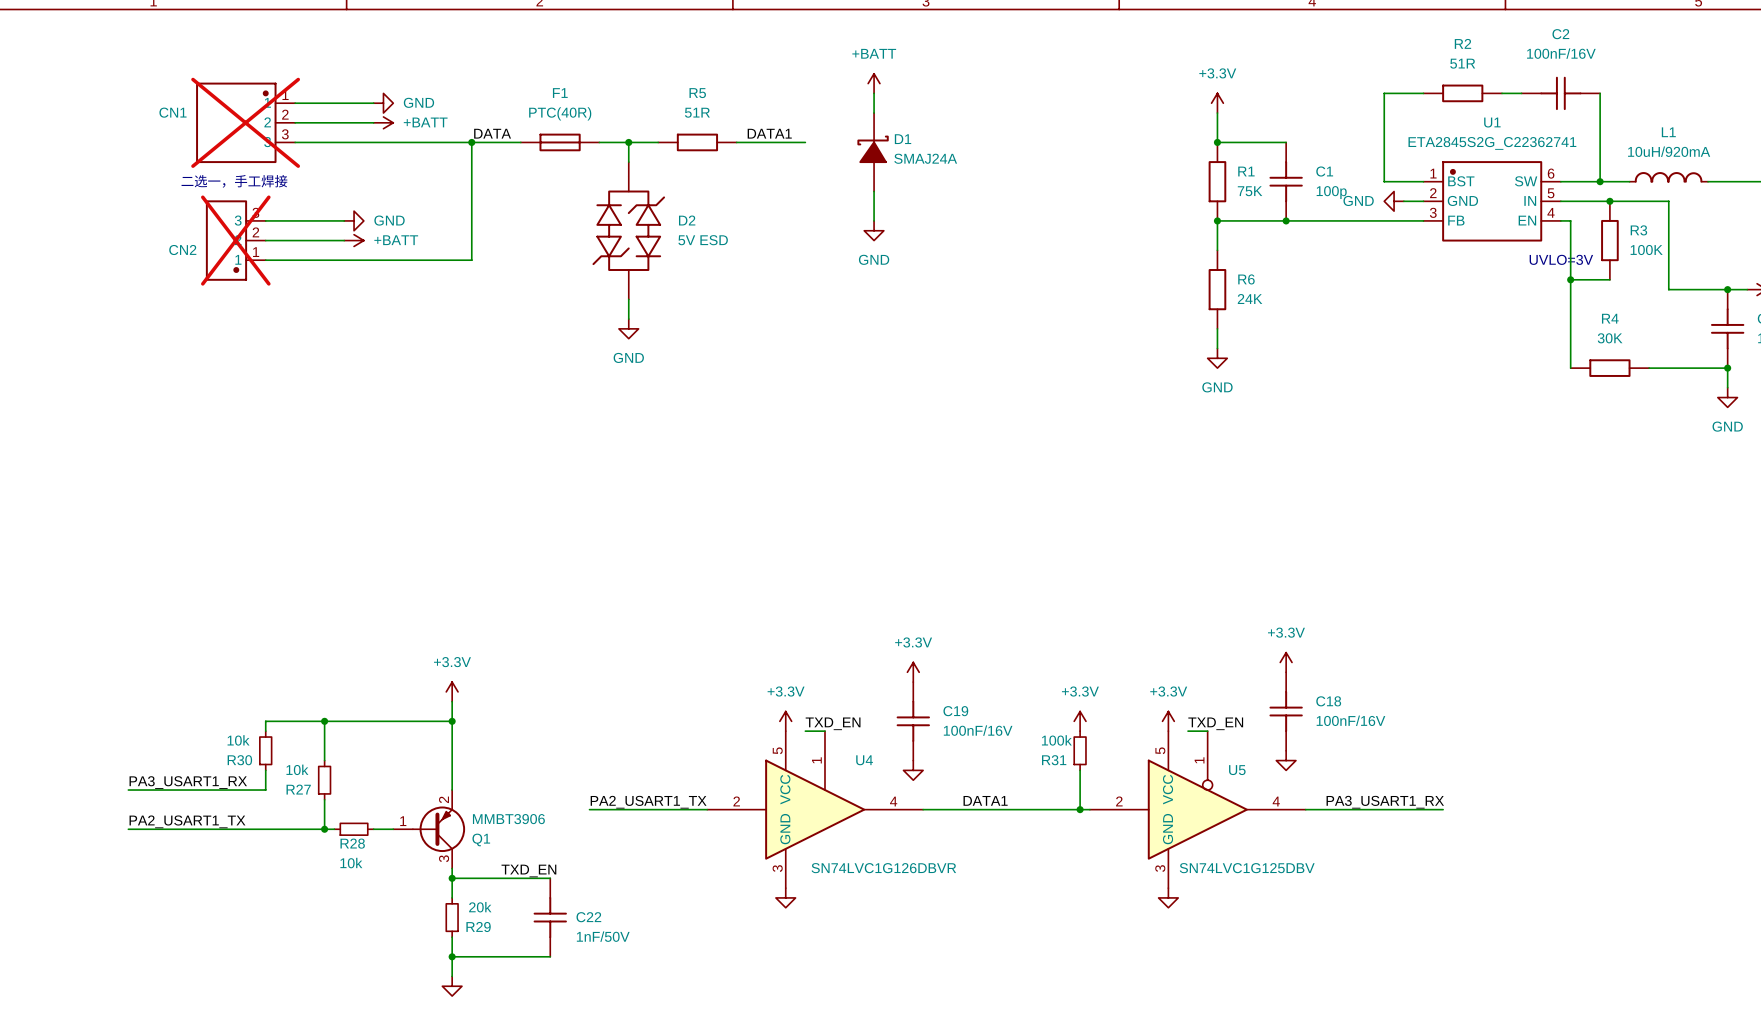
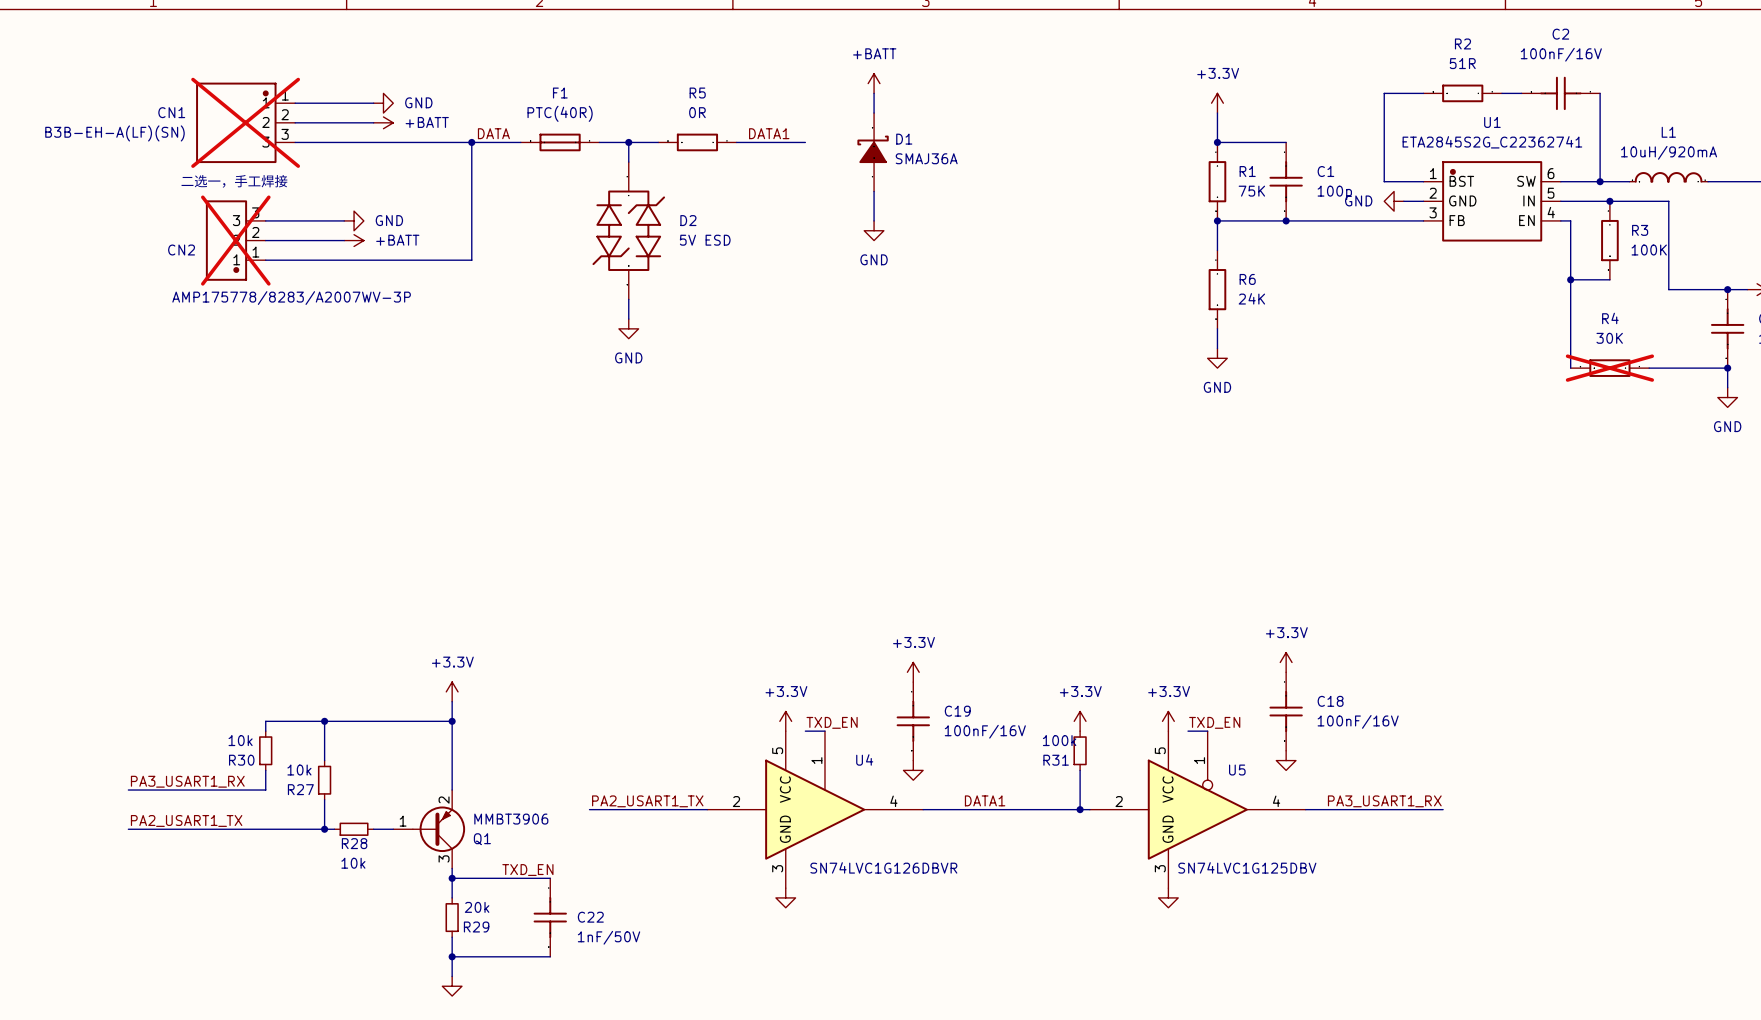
R5 value: 51R (697, 112) -> 0R (697, 112)
CN1 value: none -> B3B-EH-A(LF)(SN) (114, 133)
D1 value: SMAJ24A (925, 158) -> SMAJ36A (926, 158)
text: UVLO=3V (1561, 259) -> none
CN2 value: none -> AMP175778/8283/A2007WV-3P (291, 298)
R4 do-not-place cross: none -> (1609, 368)

